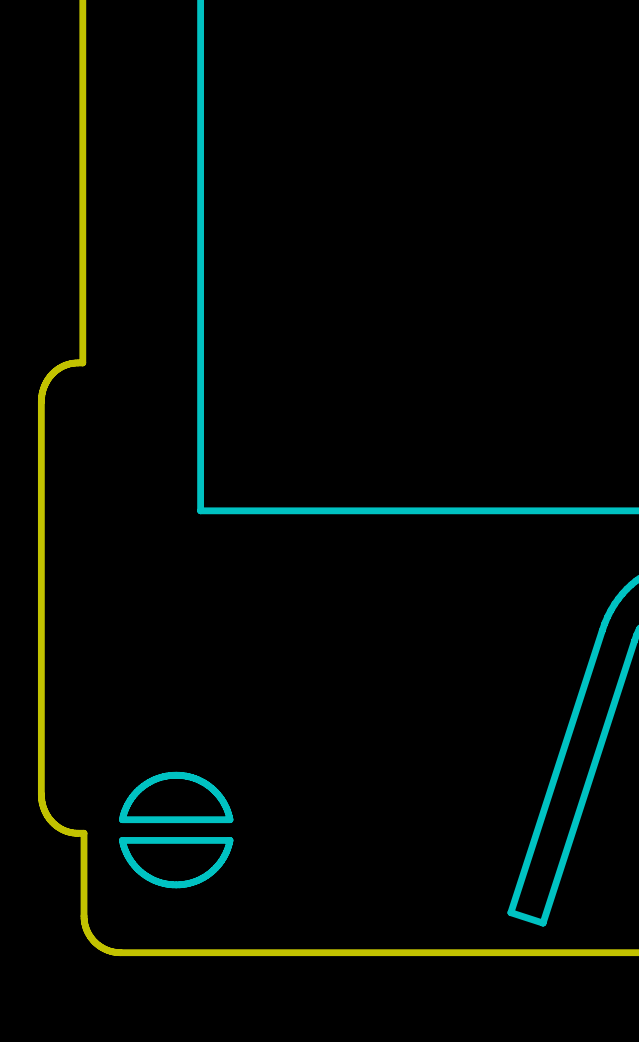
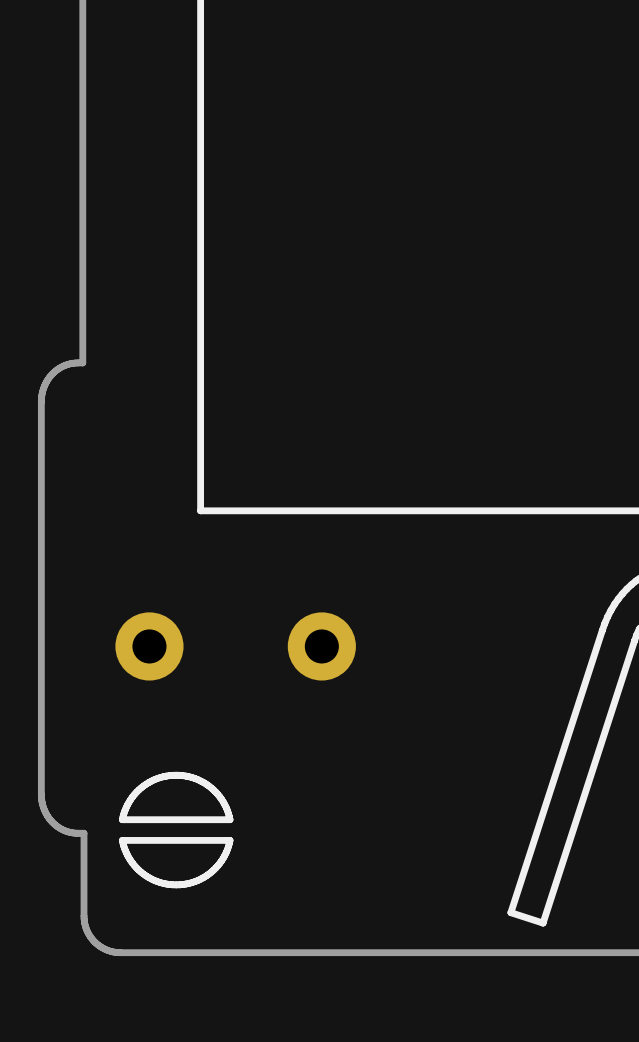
part: none -> (149, 646)
part: none -> (321, 646)

